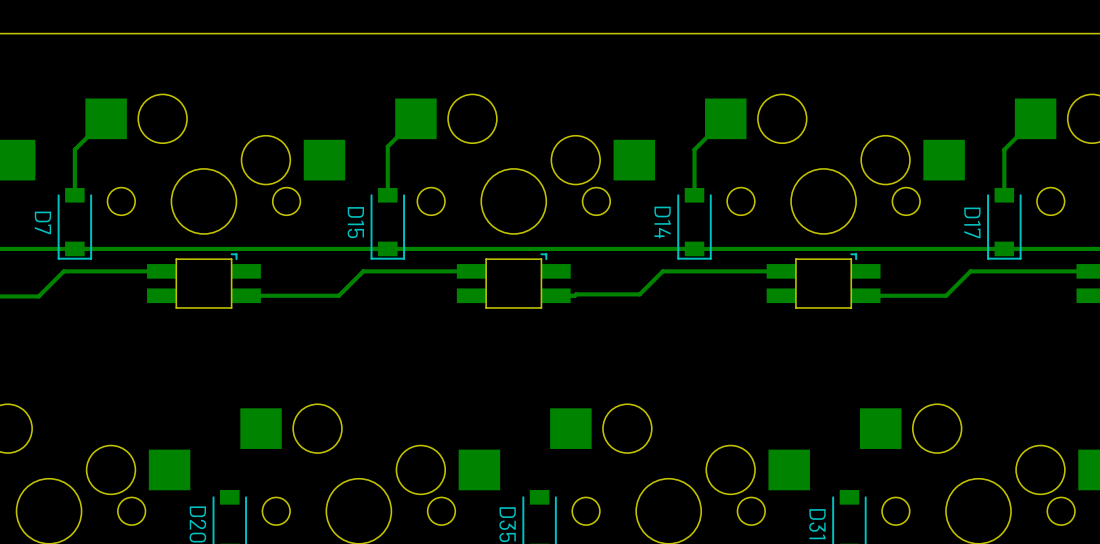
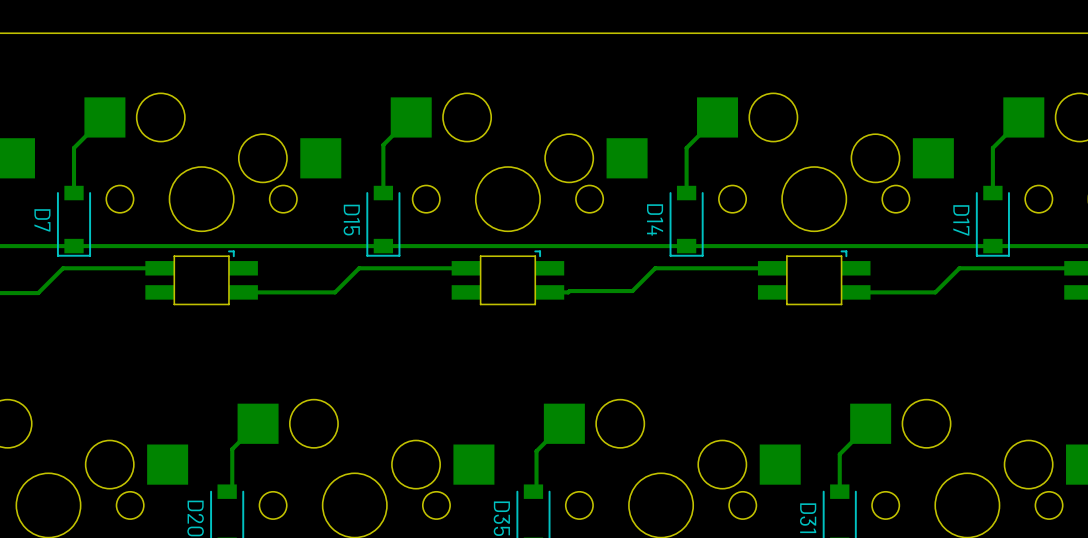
track: none -> (258, 423) (232, 449) (232, 495)
track: none -> (564, 423) (536, 451) (536, 495)
track: none -> (870, 423) (839, 454) (839, 491)

